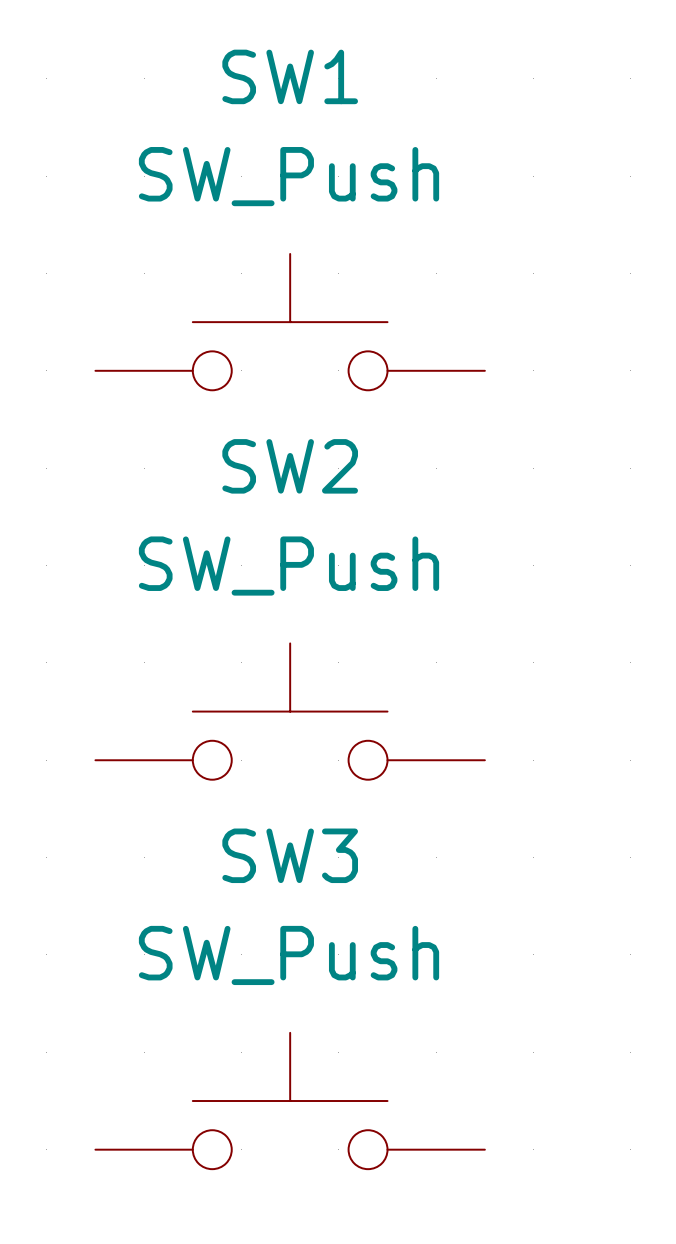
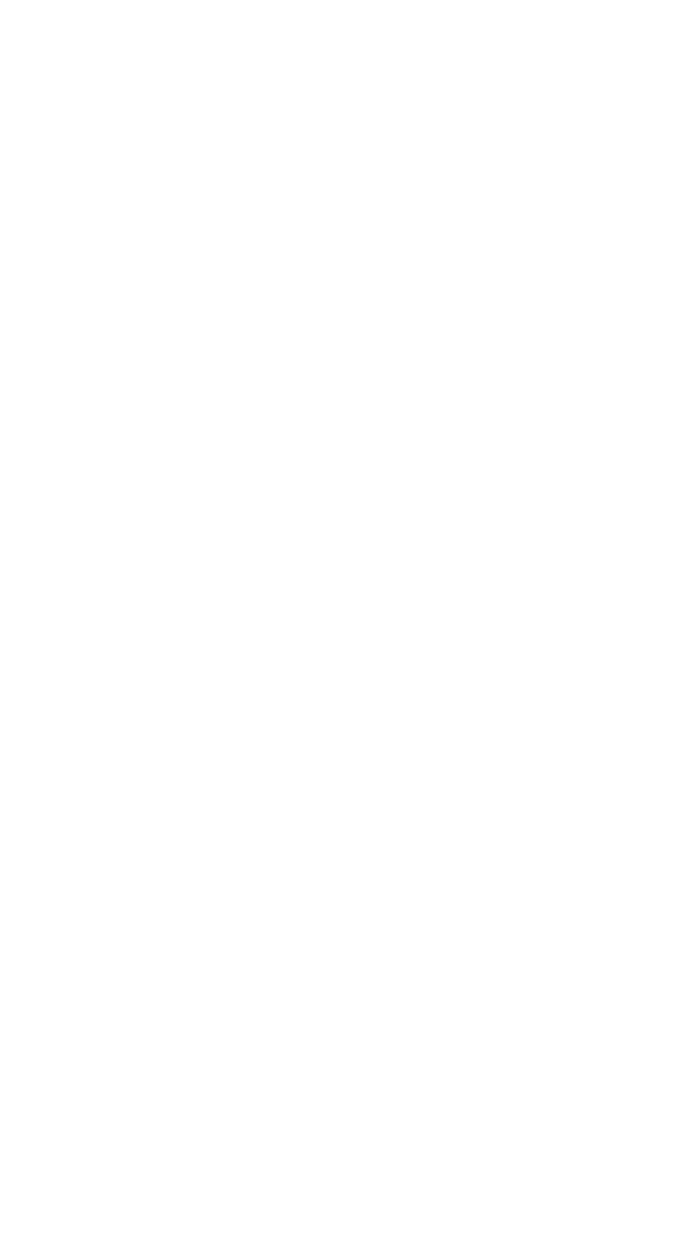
SW1: SW_Push (290, 322) -> none
SW2: SW_Push (290, 711) -> none
SW3: SW_Push (290, 1101) -> none

